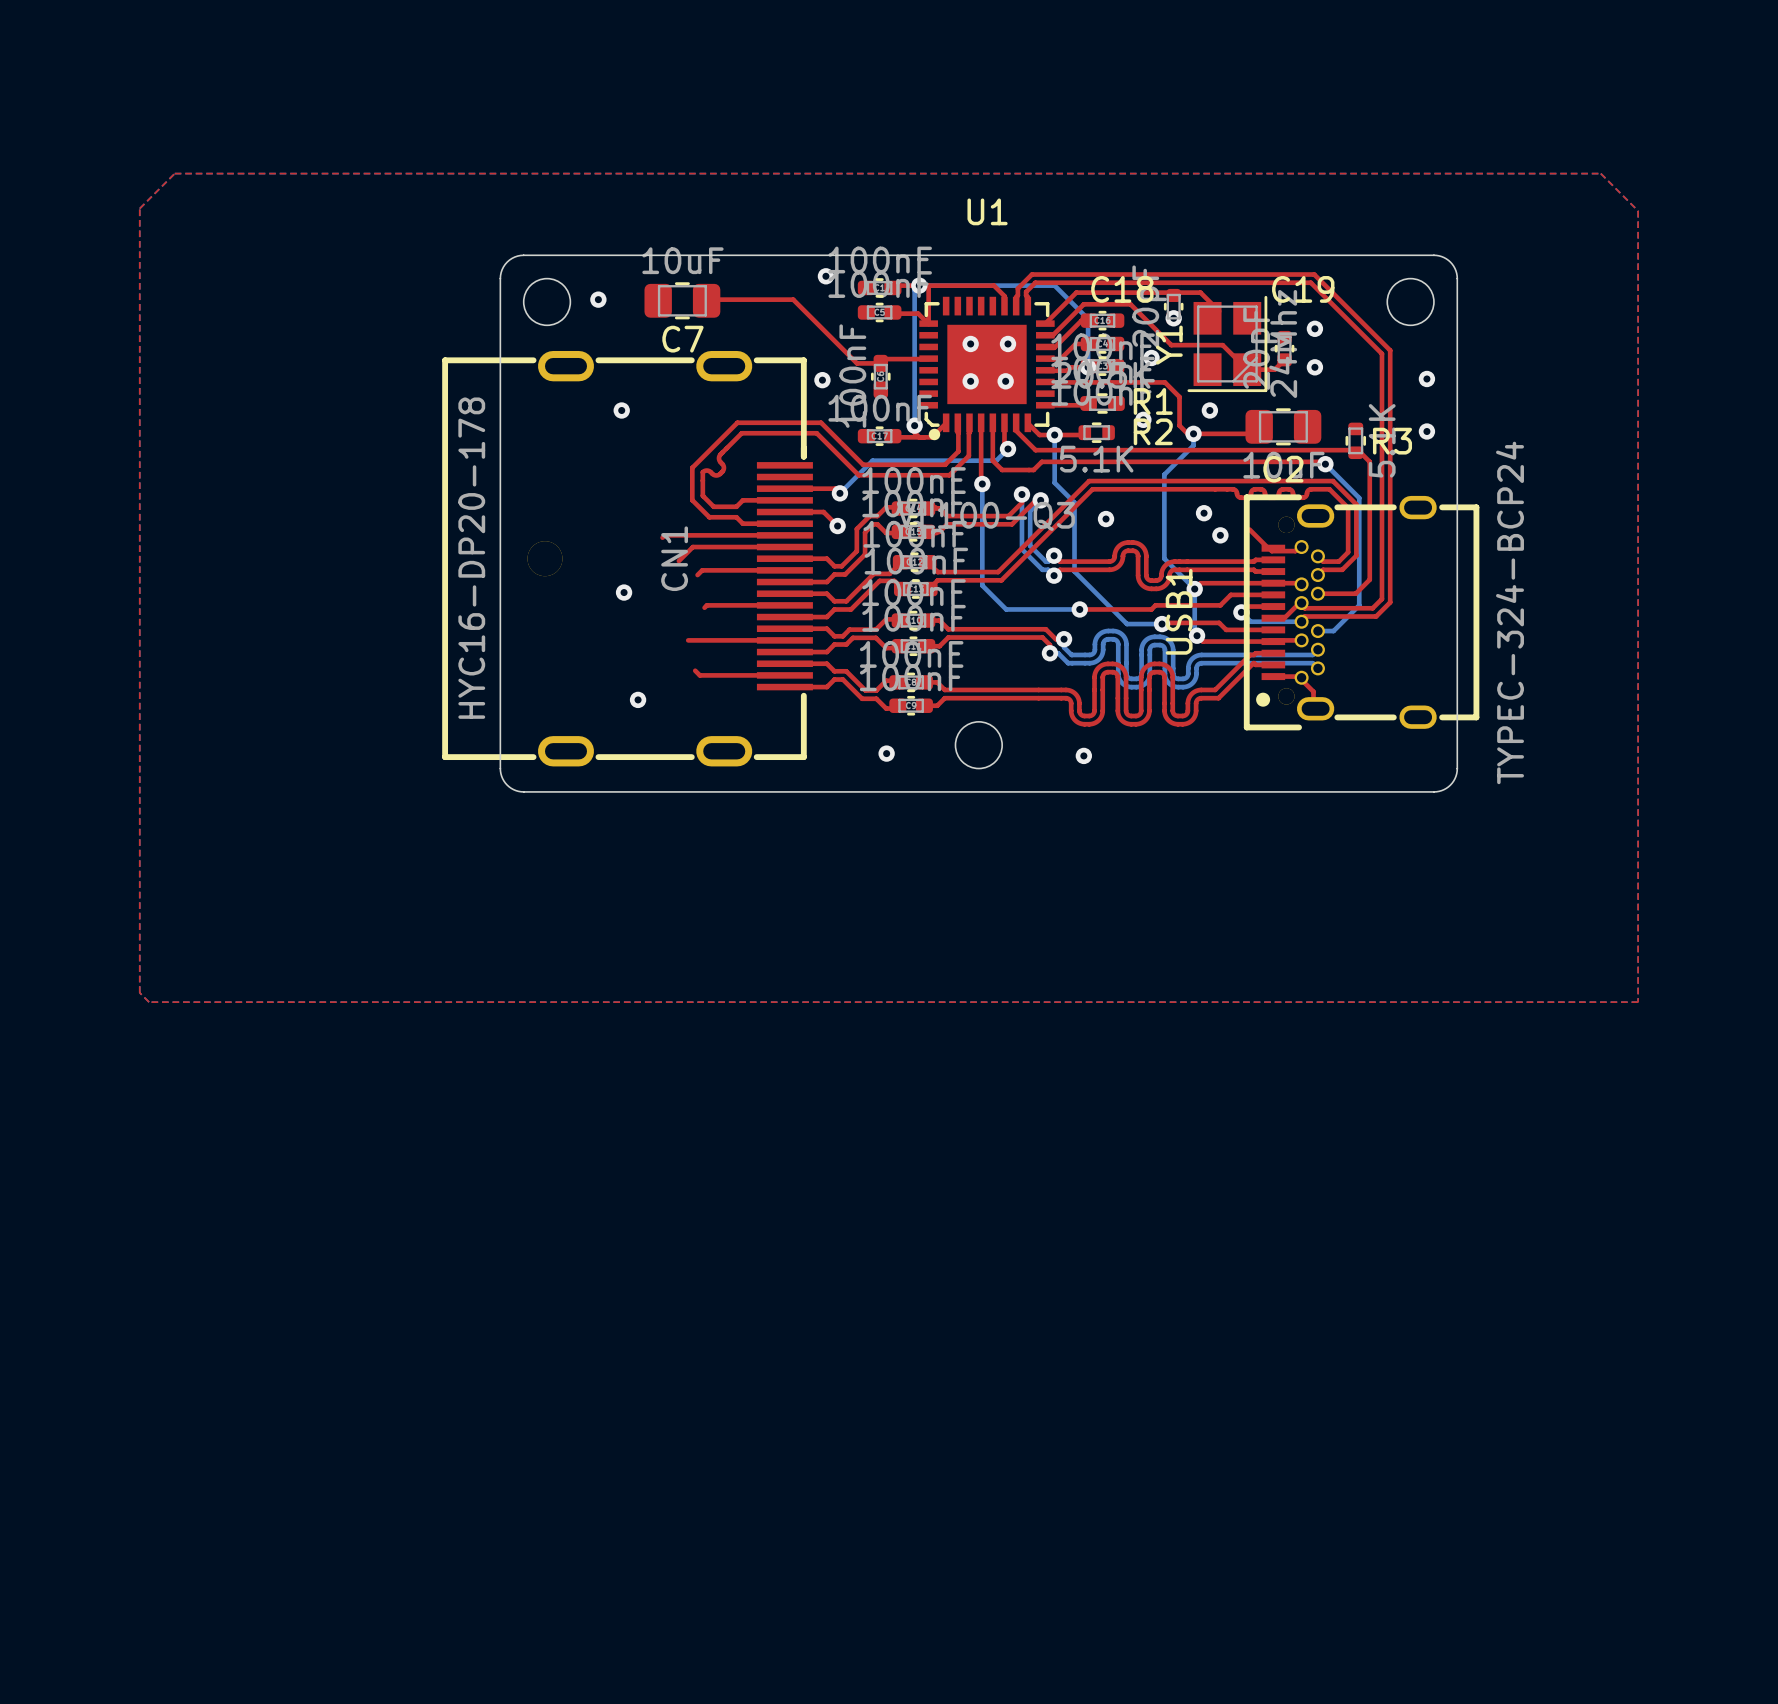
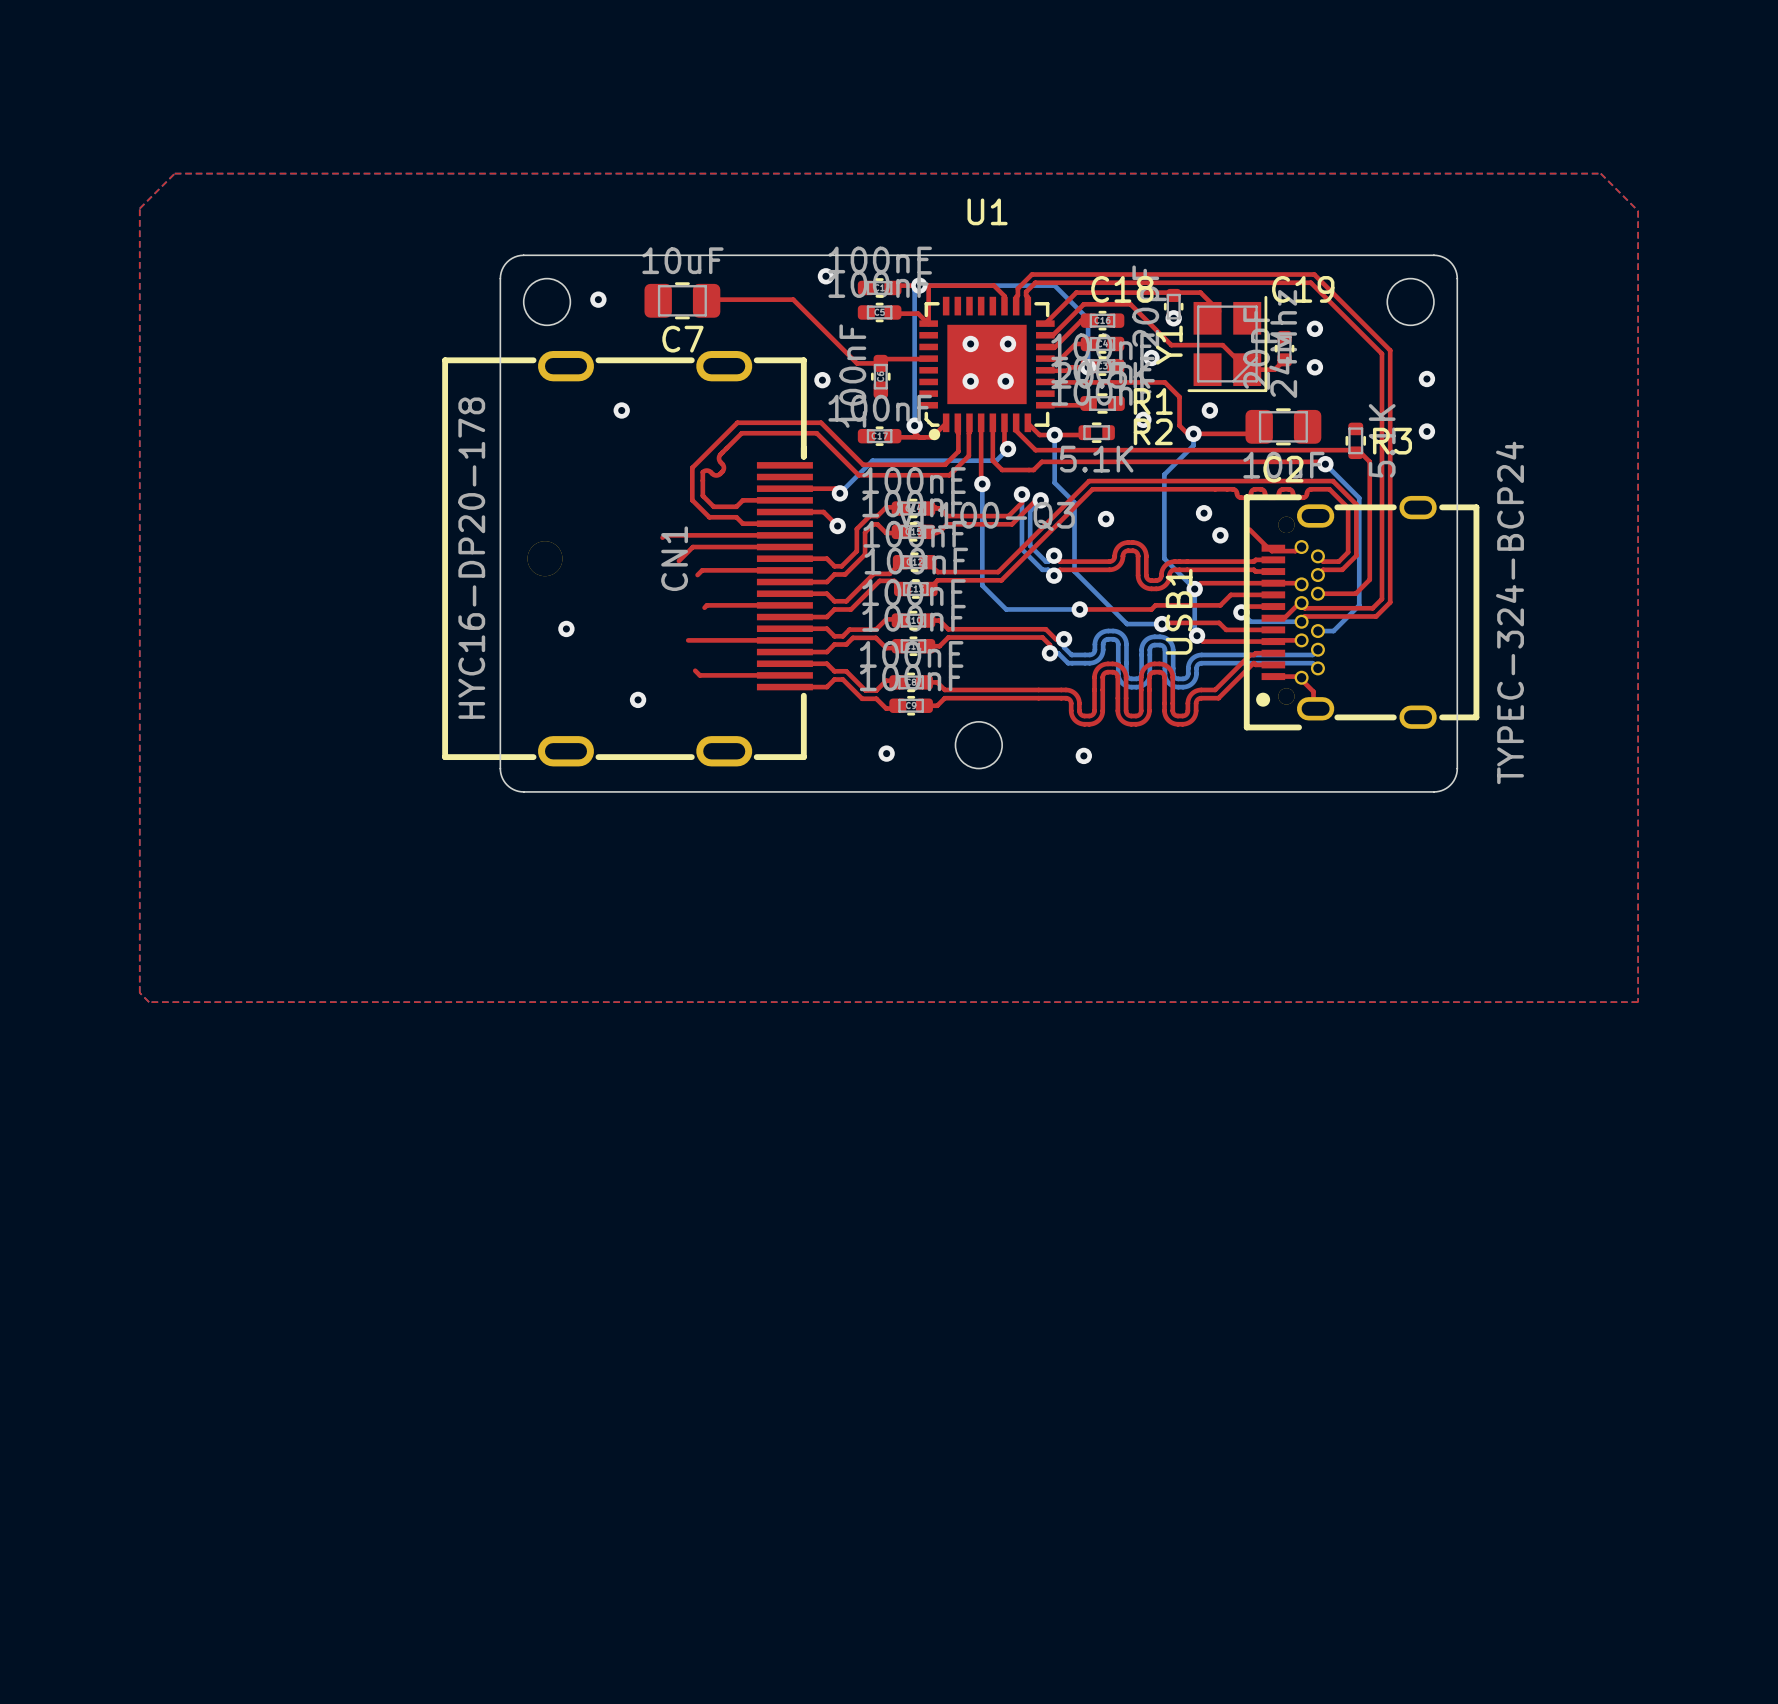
via position: (624, 592) -> (566, 628)

